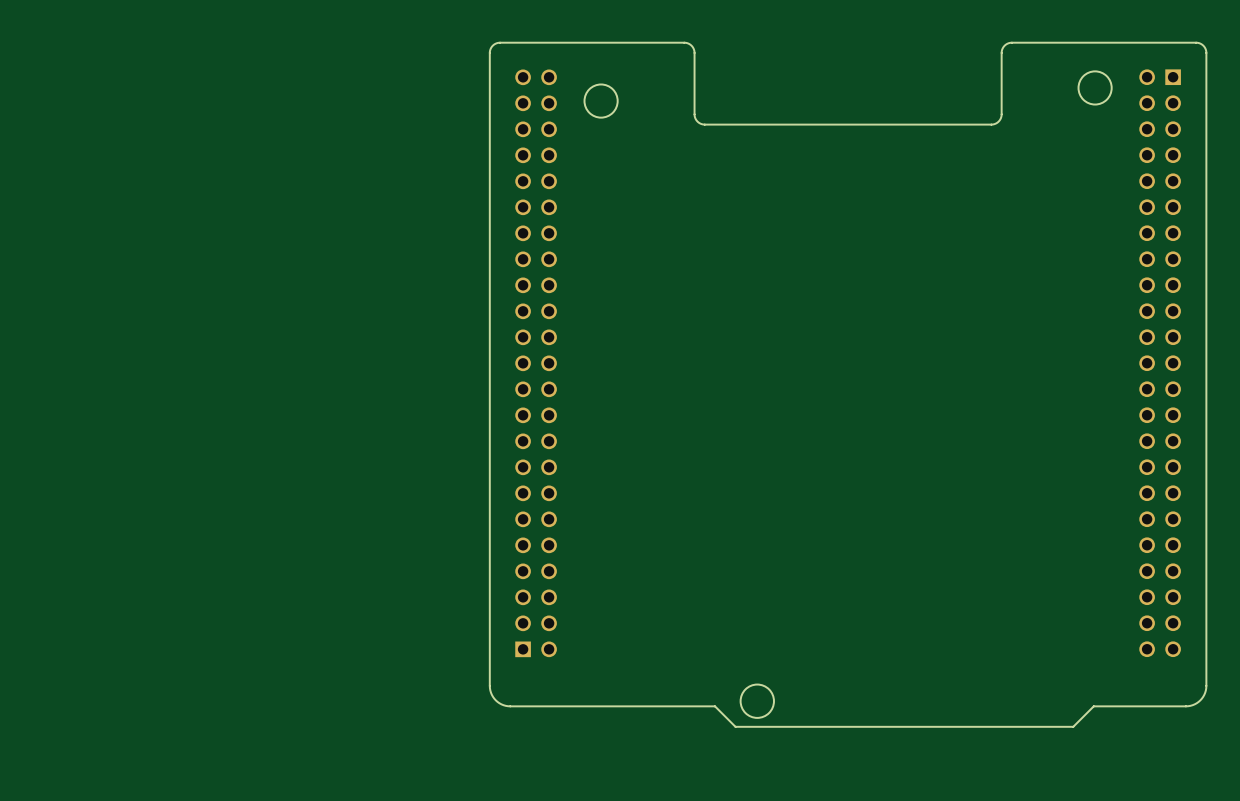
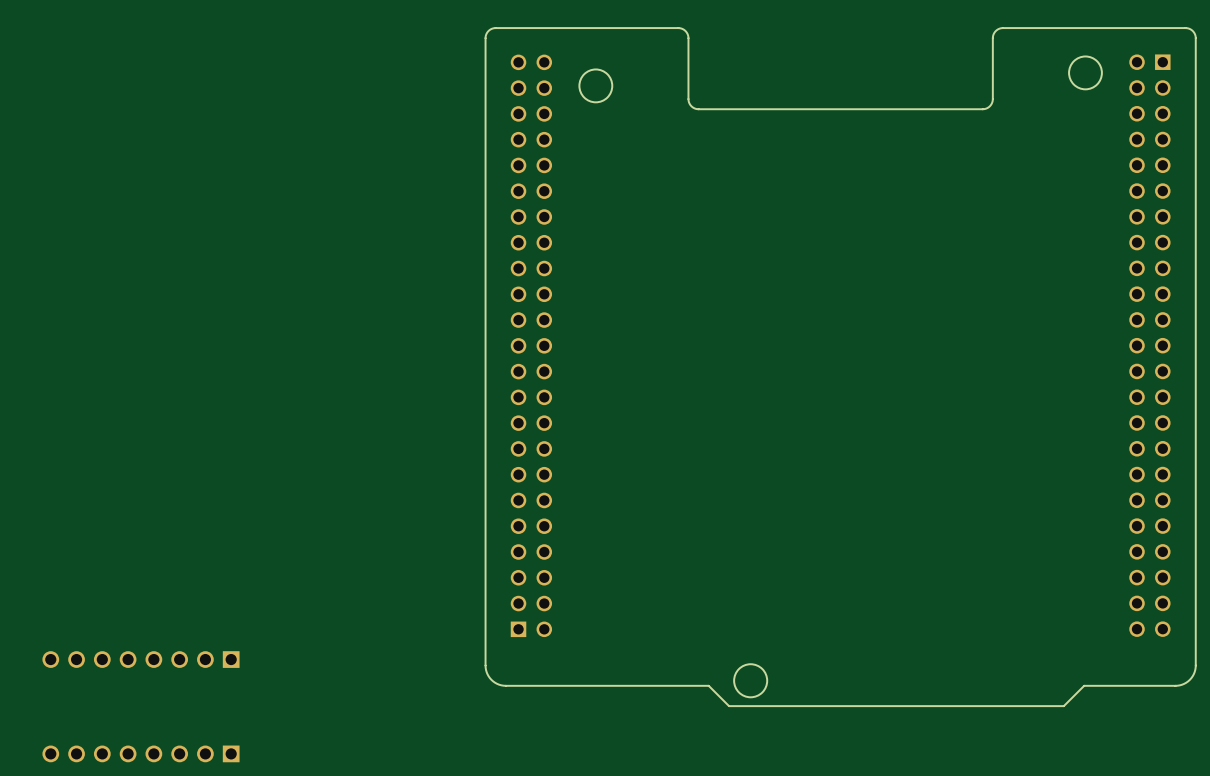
part: none -> (140, 659)
part: none -> (140, 753)

